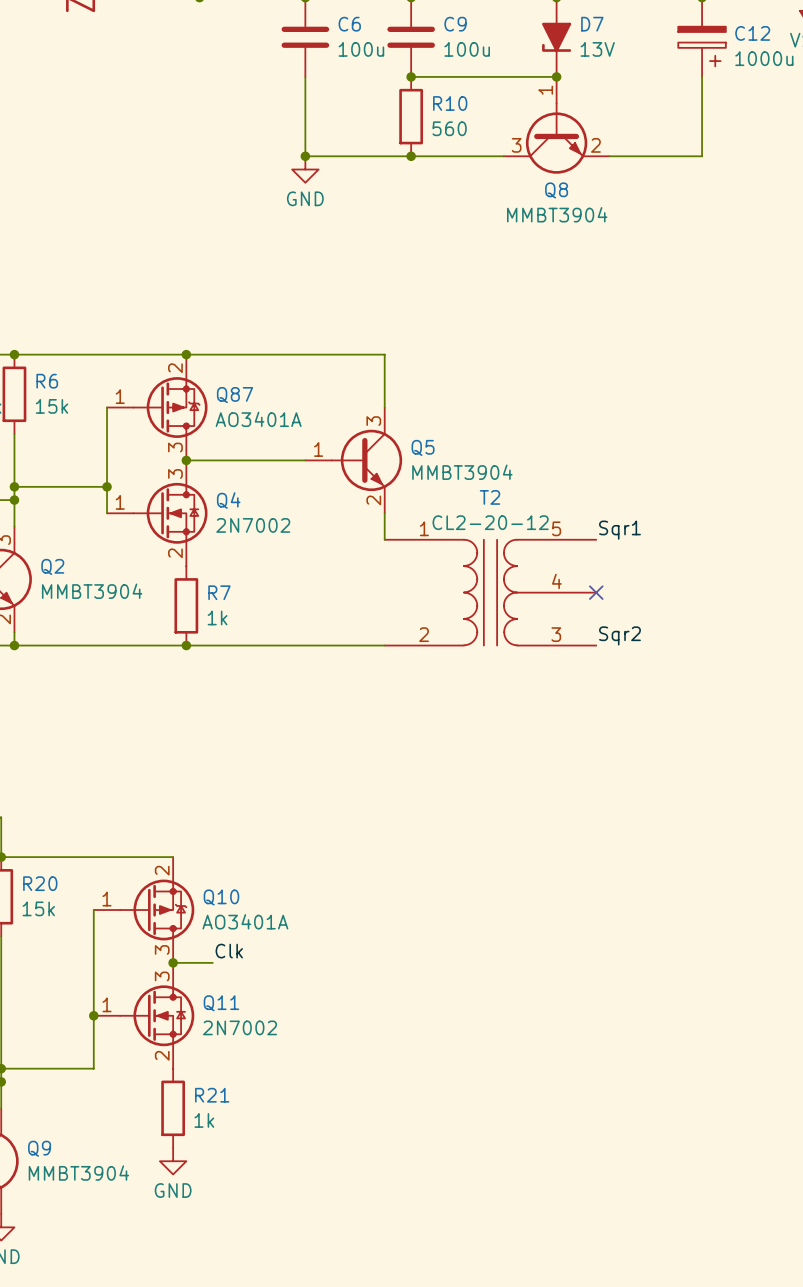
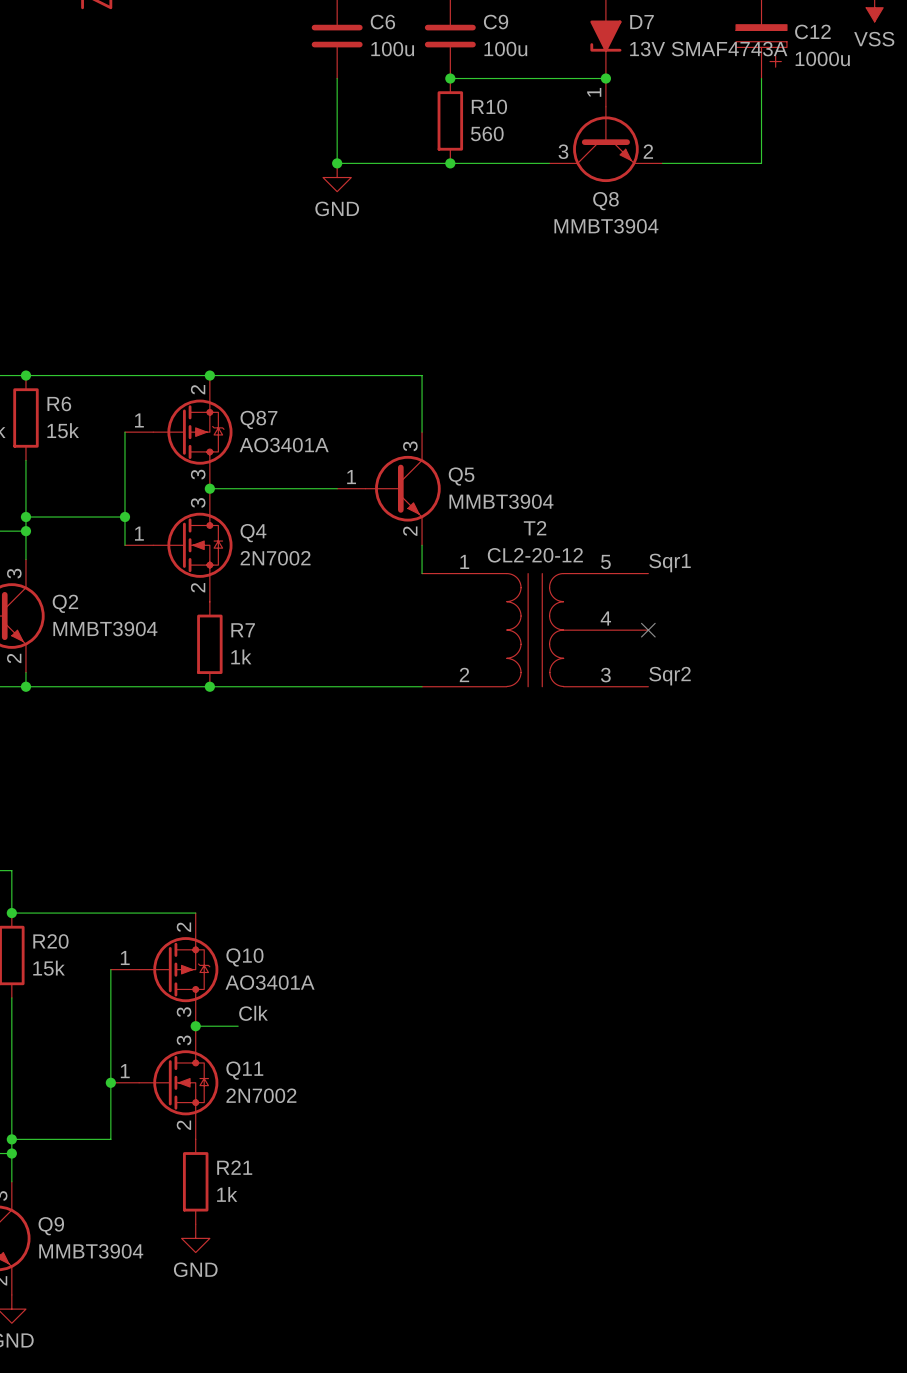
D7 value: 13V (597, 49) -> 13V SMAF4743A (708, 49)

